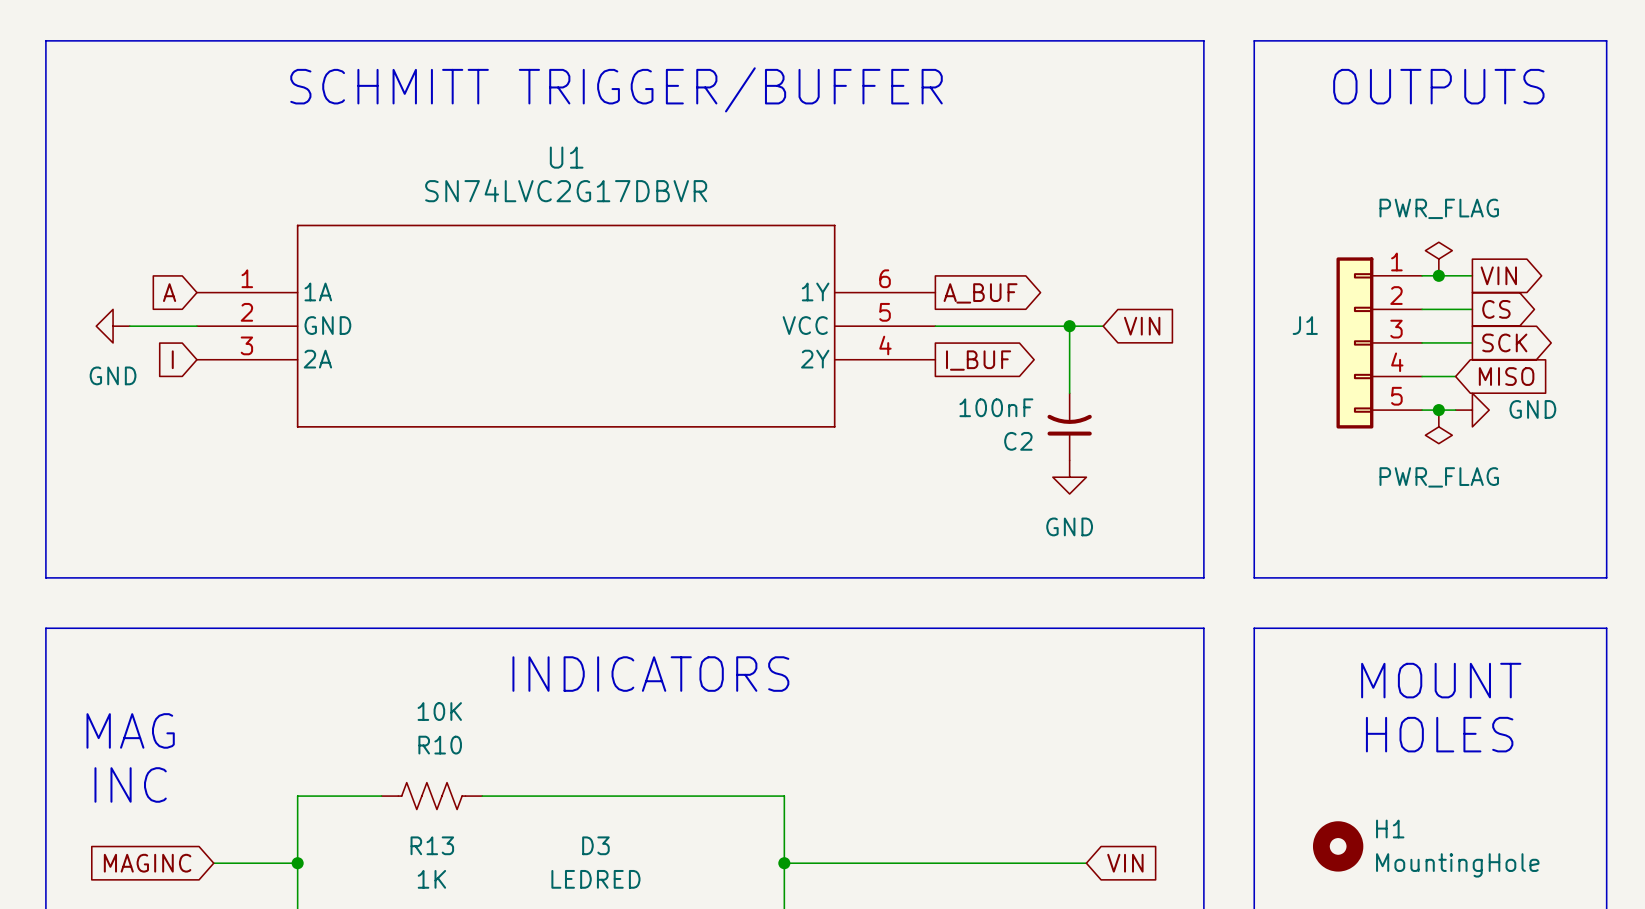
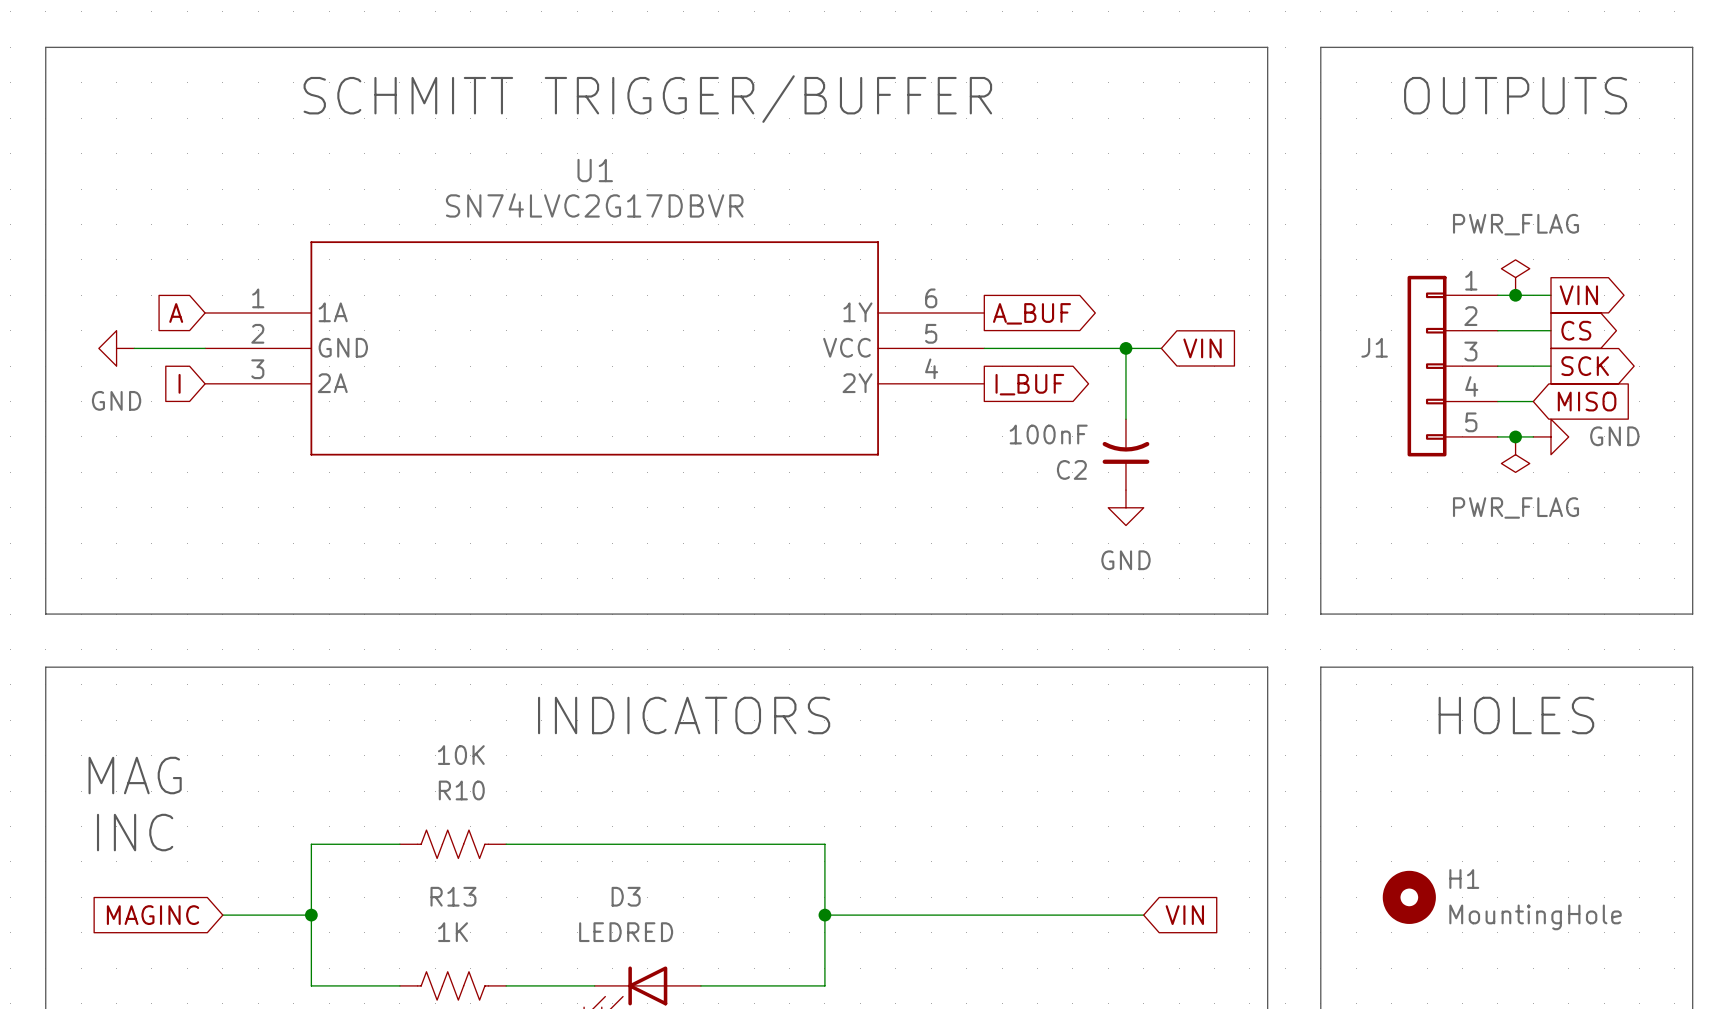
text: MOUNT (1441, 680) -> HOLES (1516, 715)
text: HOLES (1439, 734) -> none

